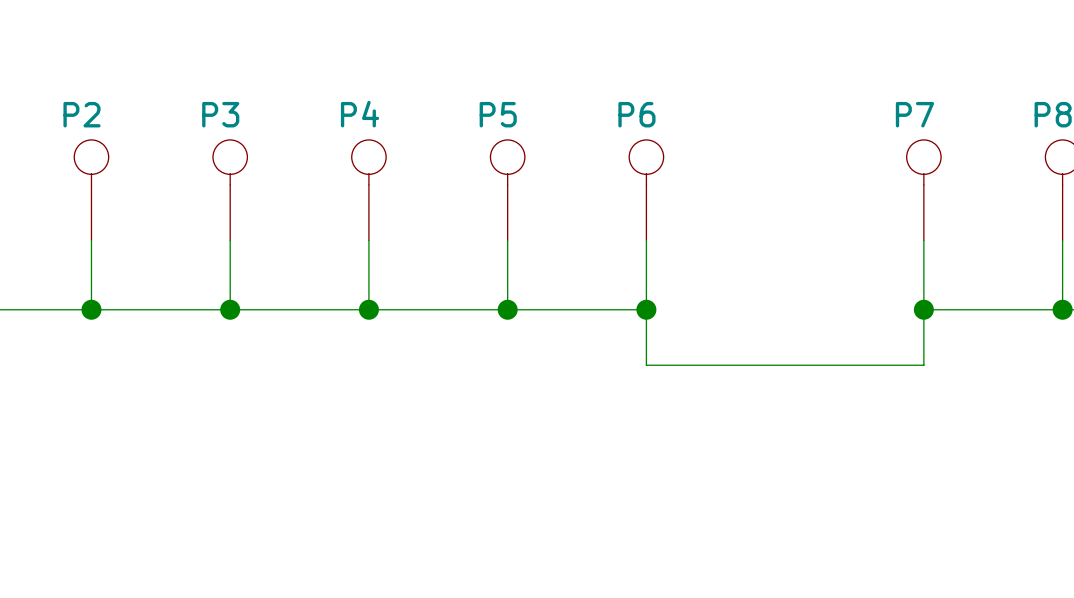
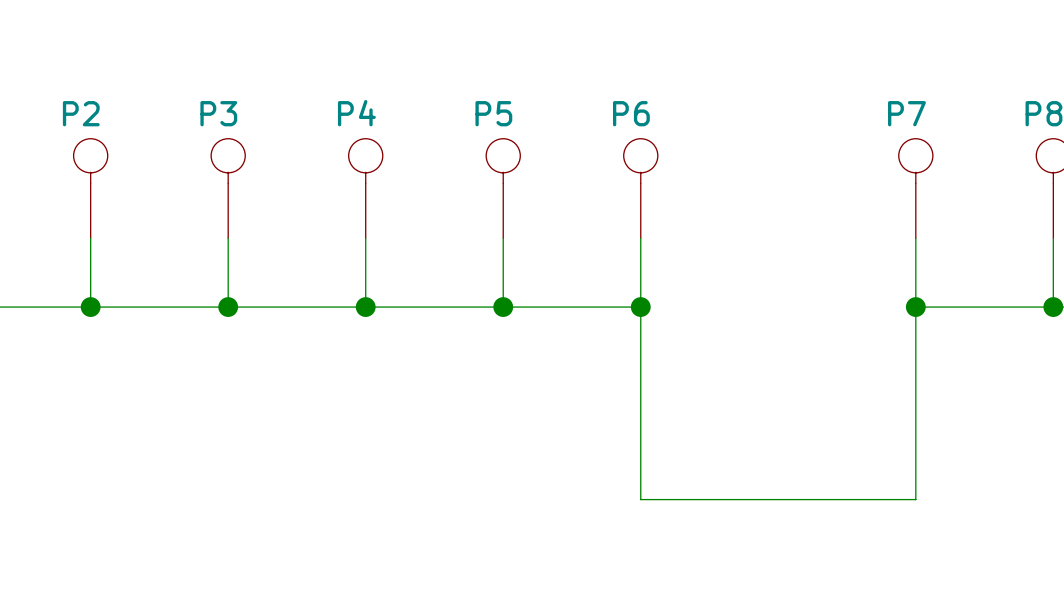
wire: (646, 365) (923, 365) -> (640, 362) (640, 499) (915, 499) (915, 362)

